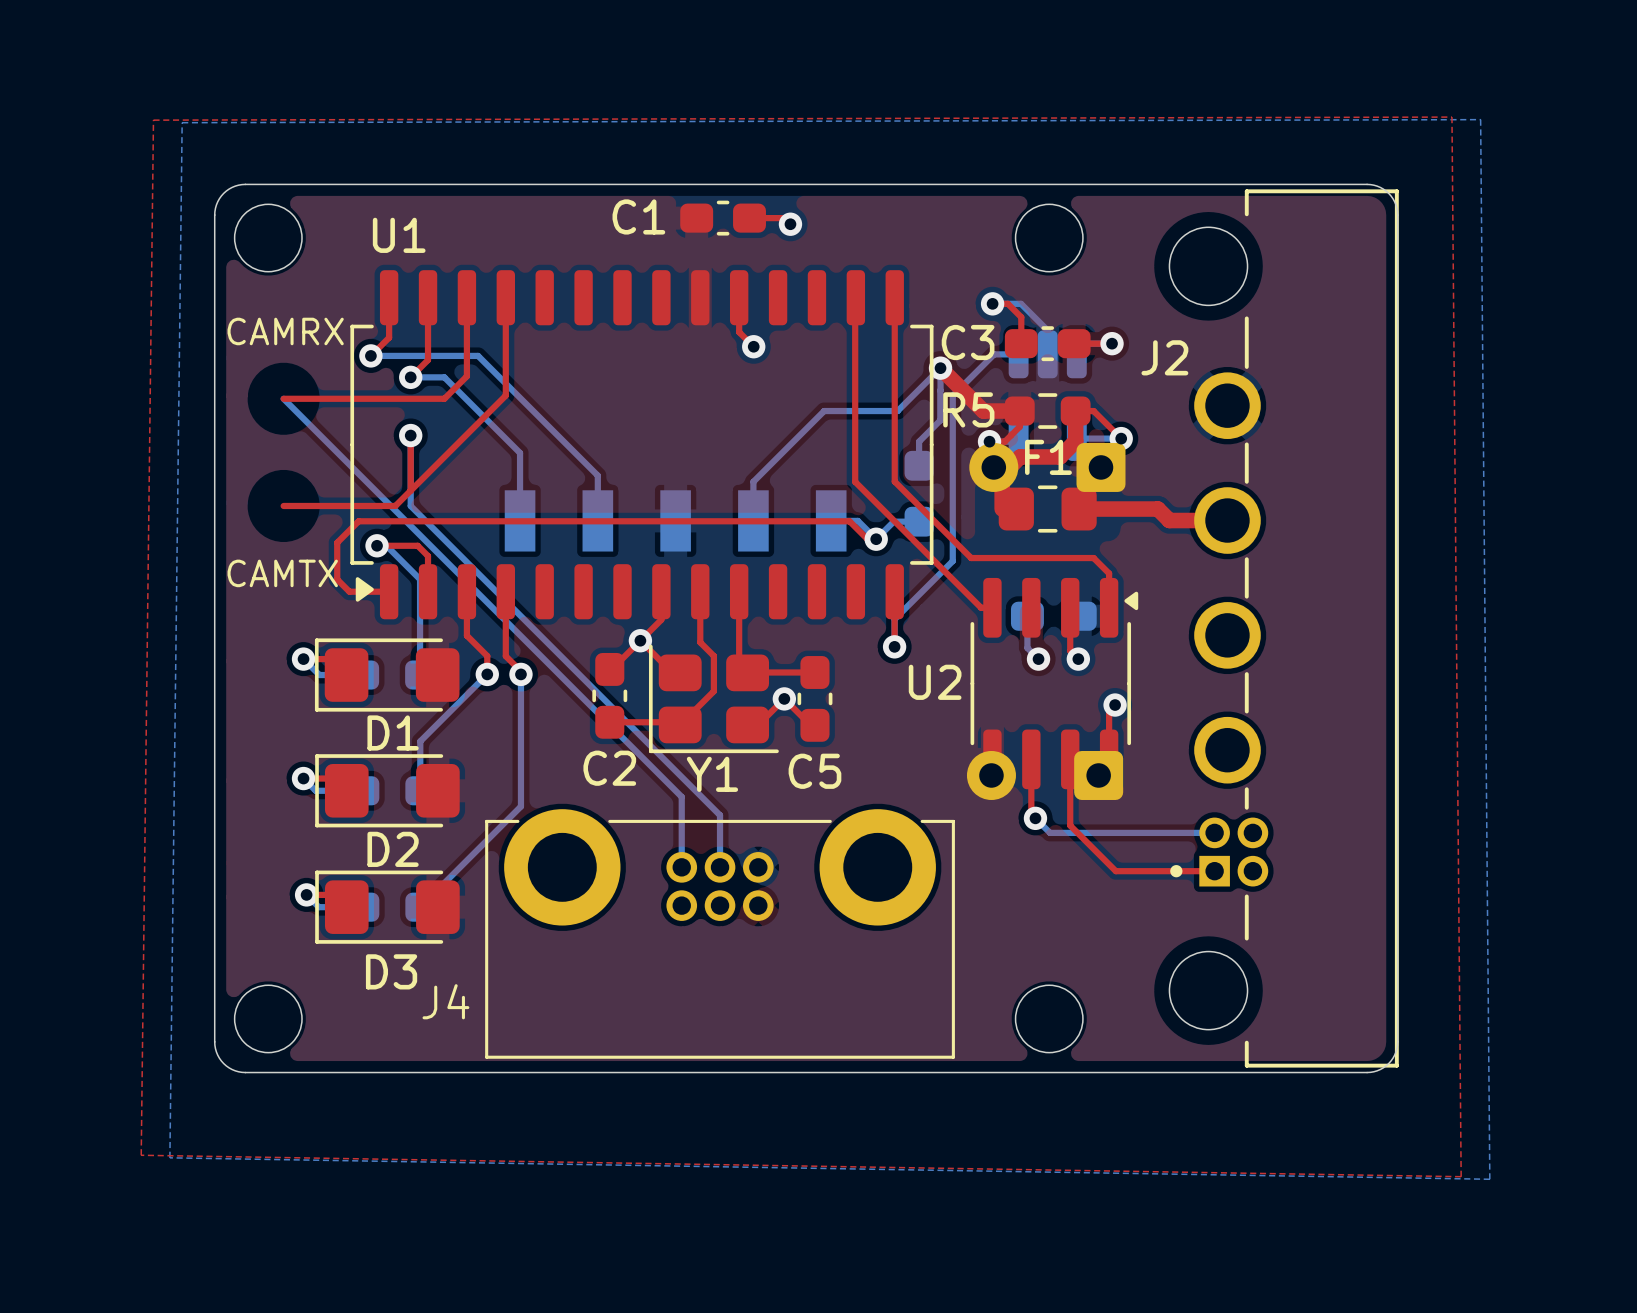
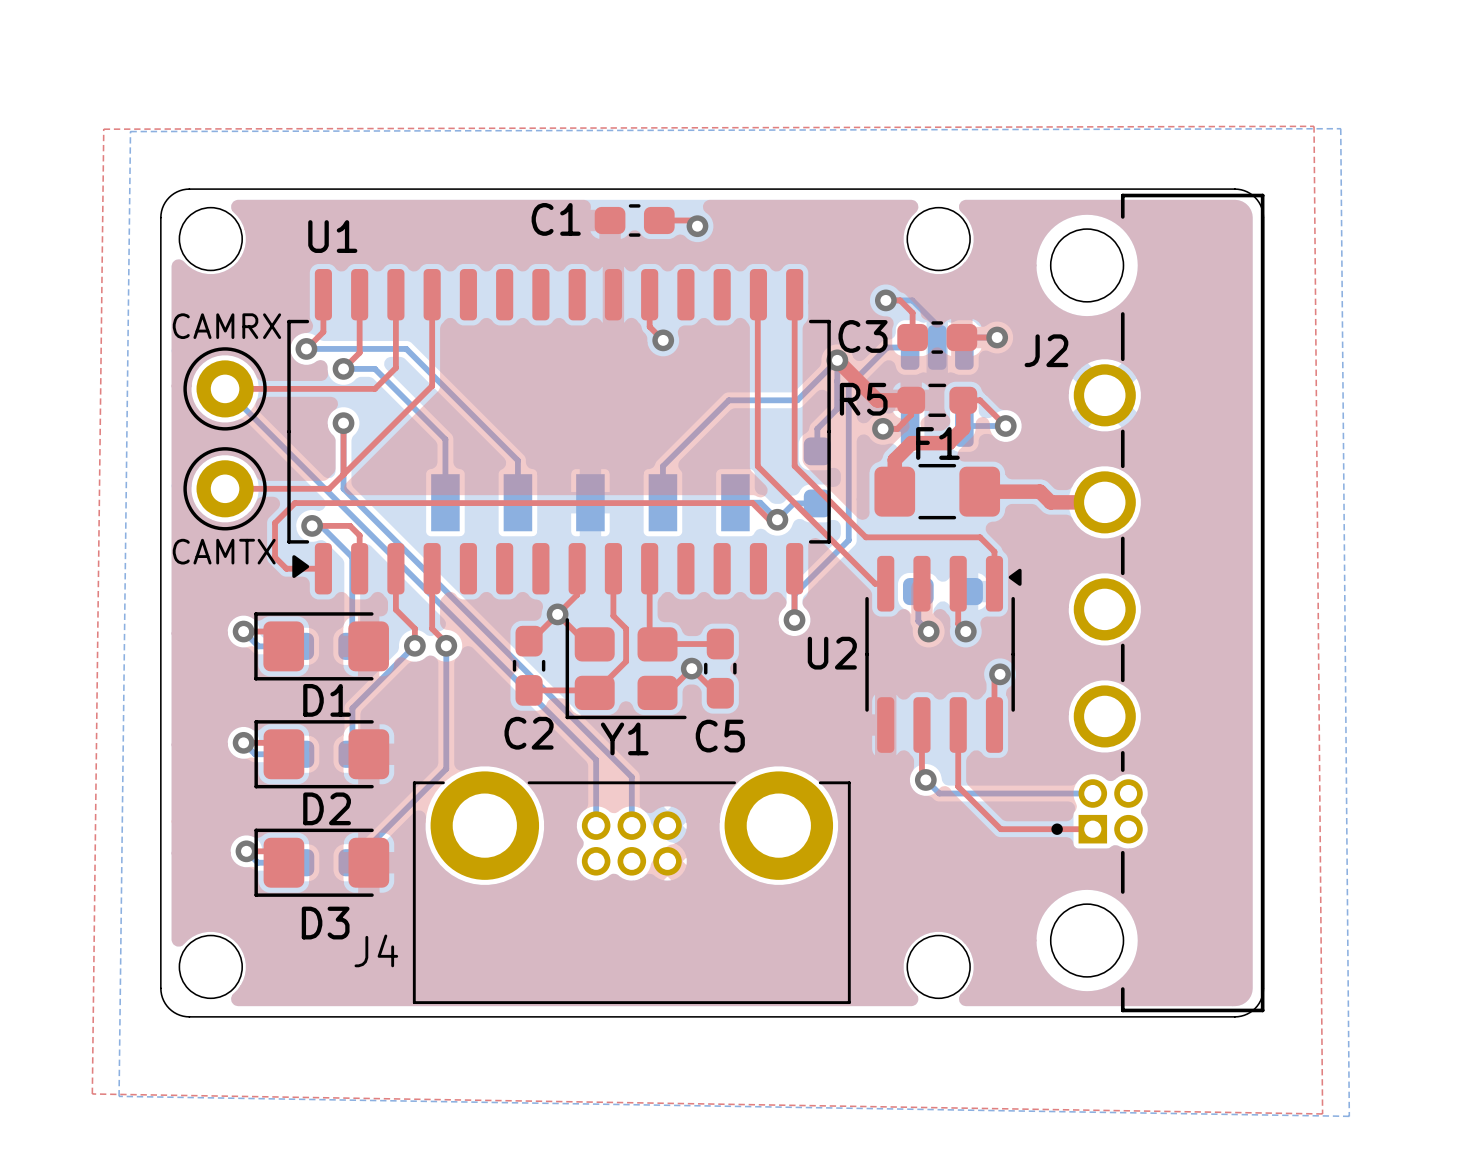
part: none -> (225, 388)
part: (1047, 467) -> none
F1 footprint: [998, 485, 1097, 533] -> [874, 463, 1001, 520]
part: none -> (225, 488)
part: (1045, 775) -> none

